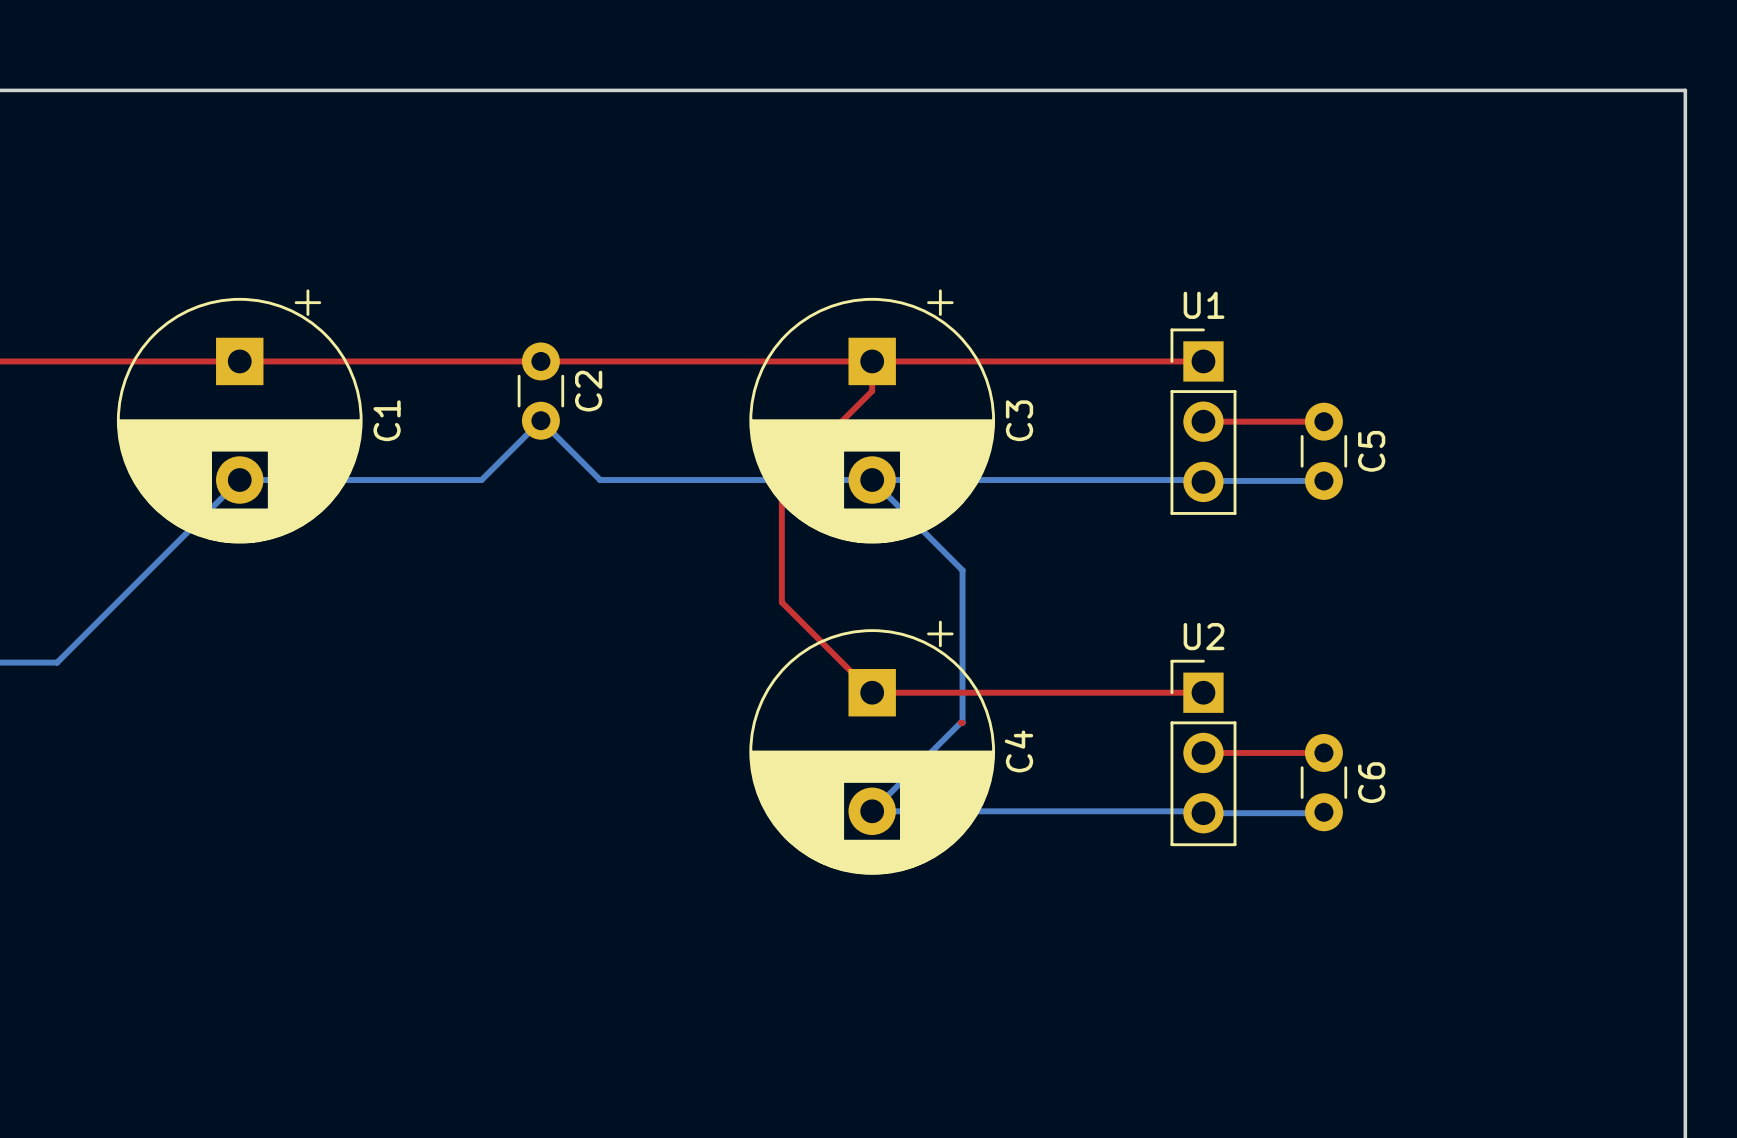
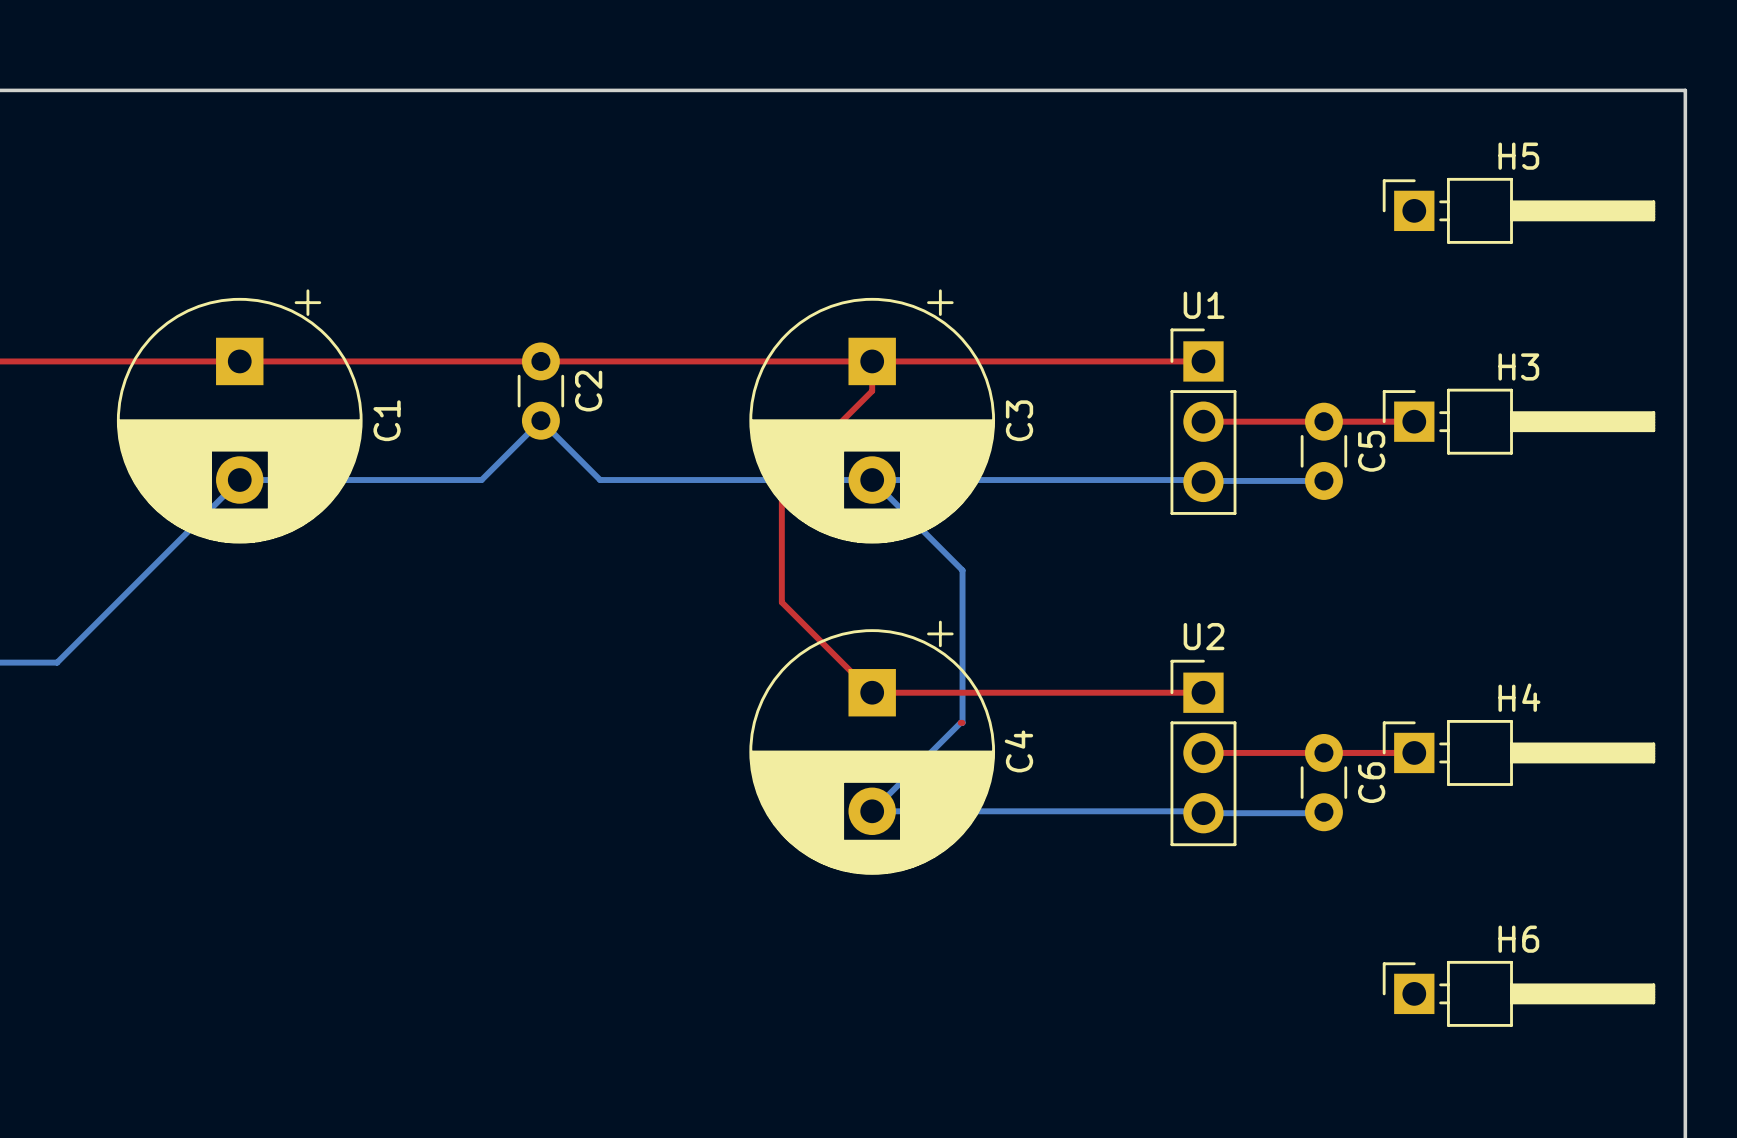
H5: none -> (1518, 210)
top track: none -> (1323, 421) (1414, 421)
H3: none -> (1518, 421)
top track: none -> (1323, 752) (1414, 752)
H4: none -> (1518, 752)
H6: none -> (1518, 993)

